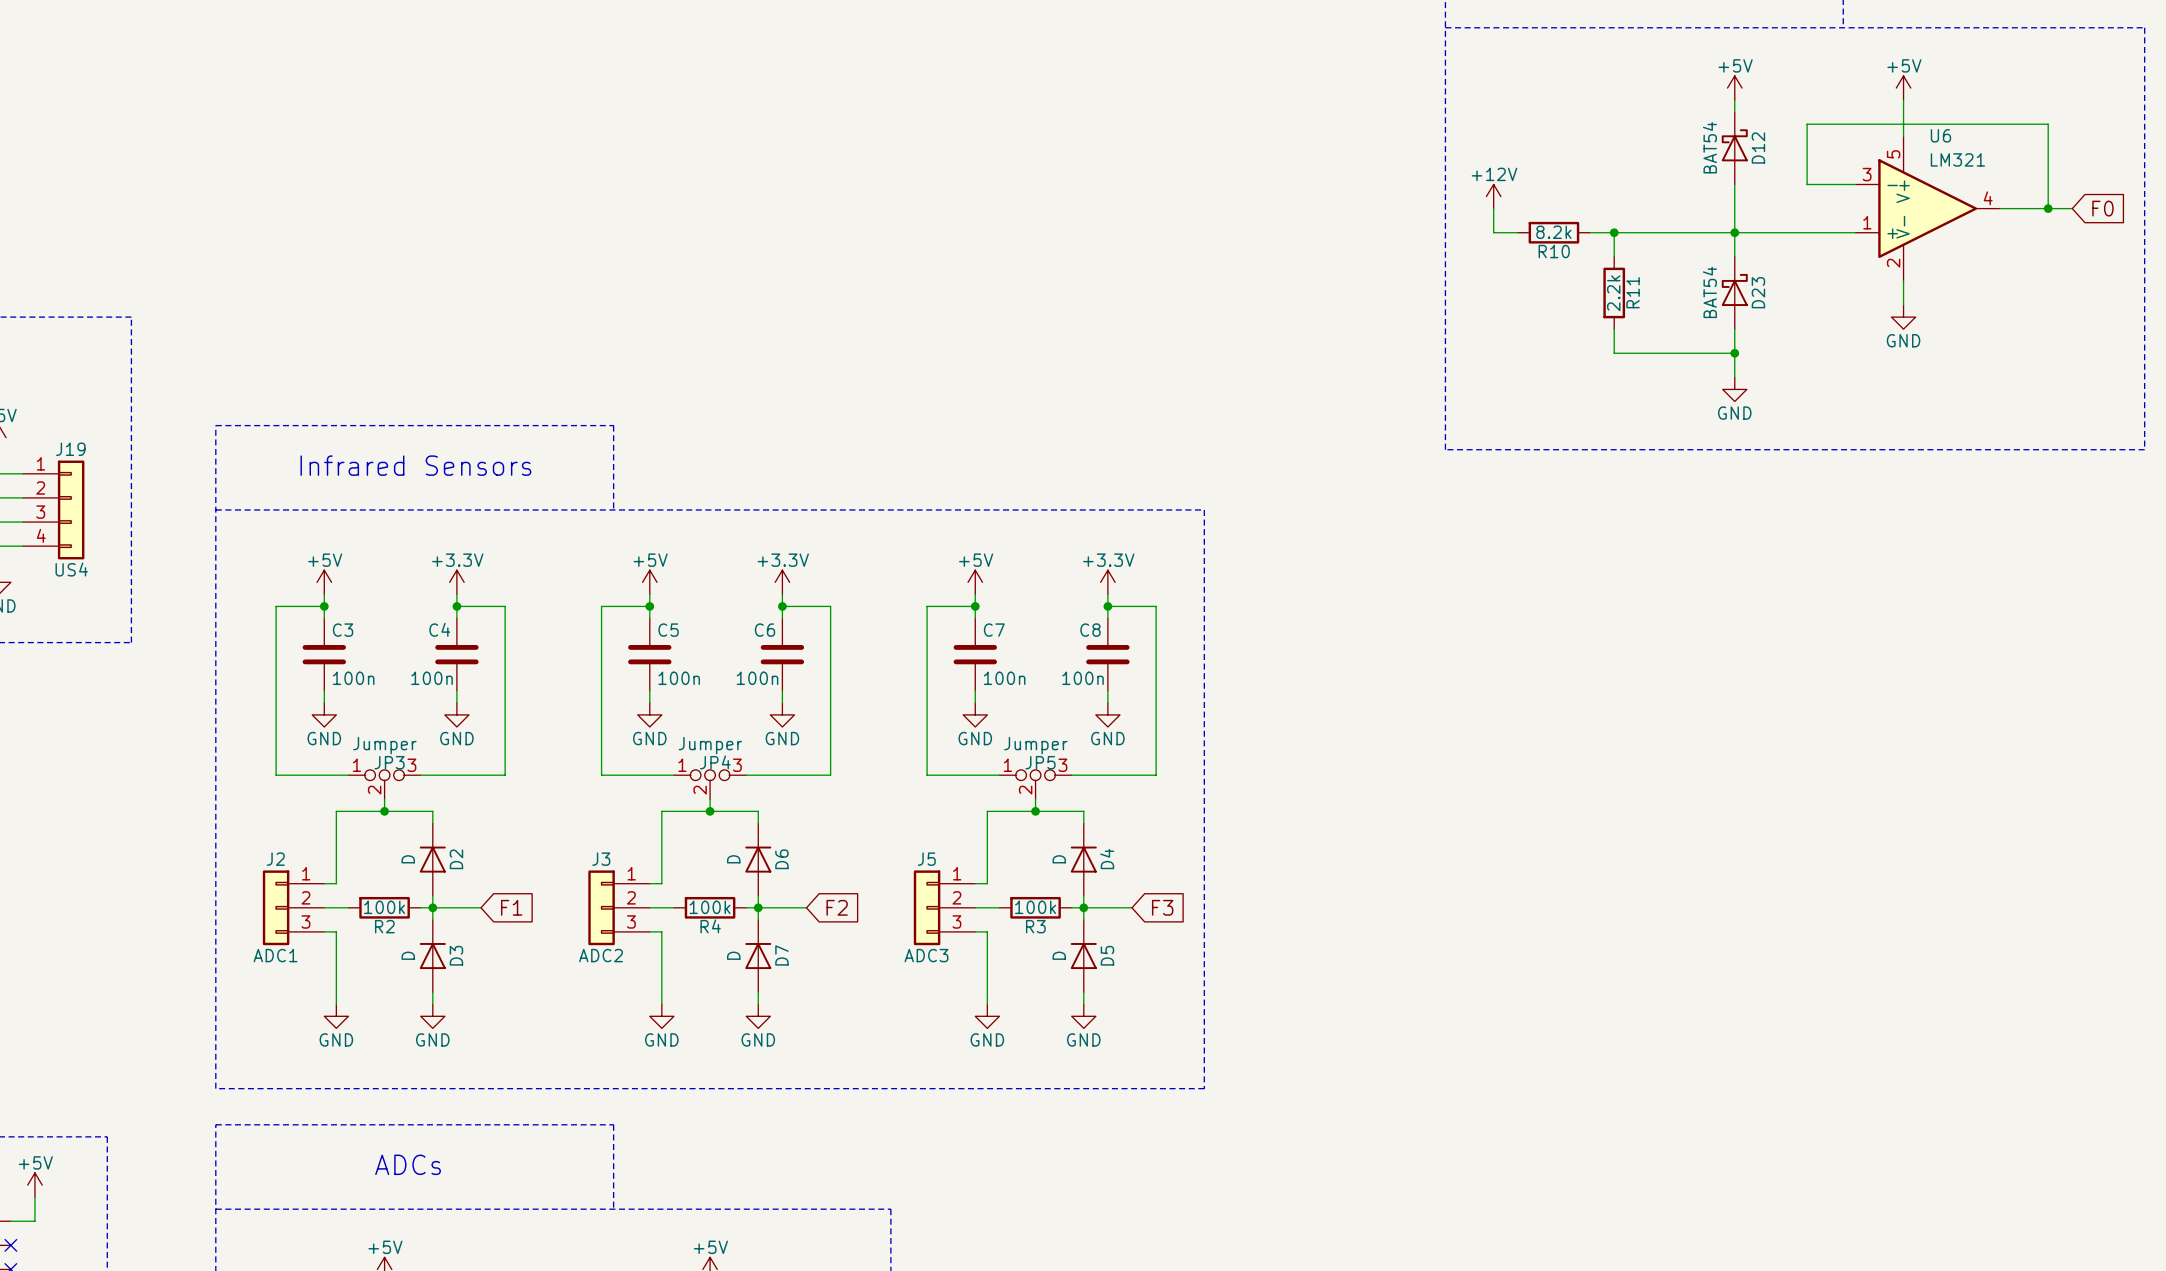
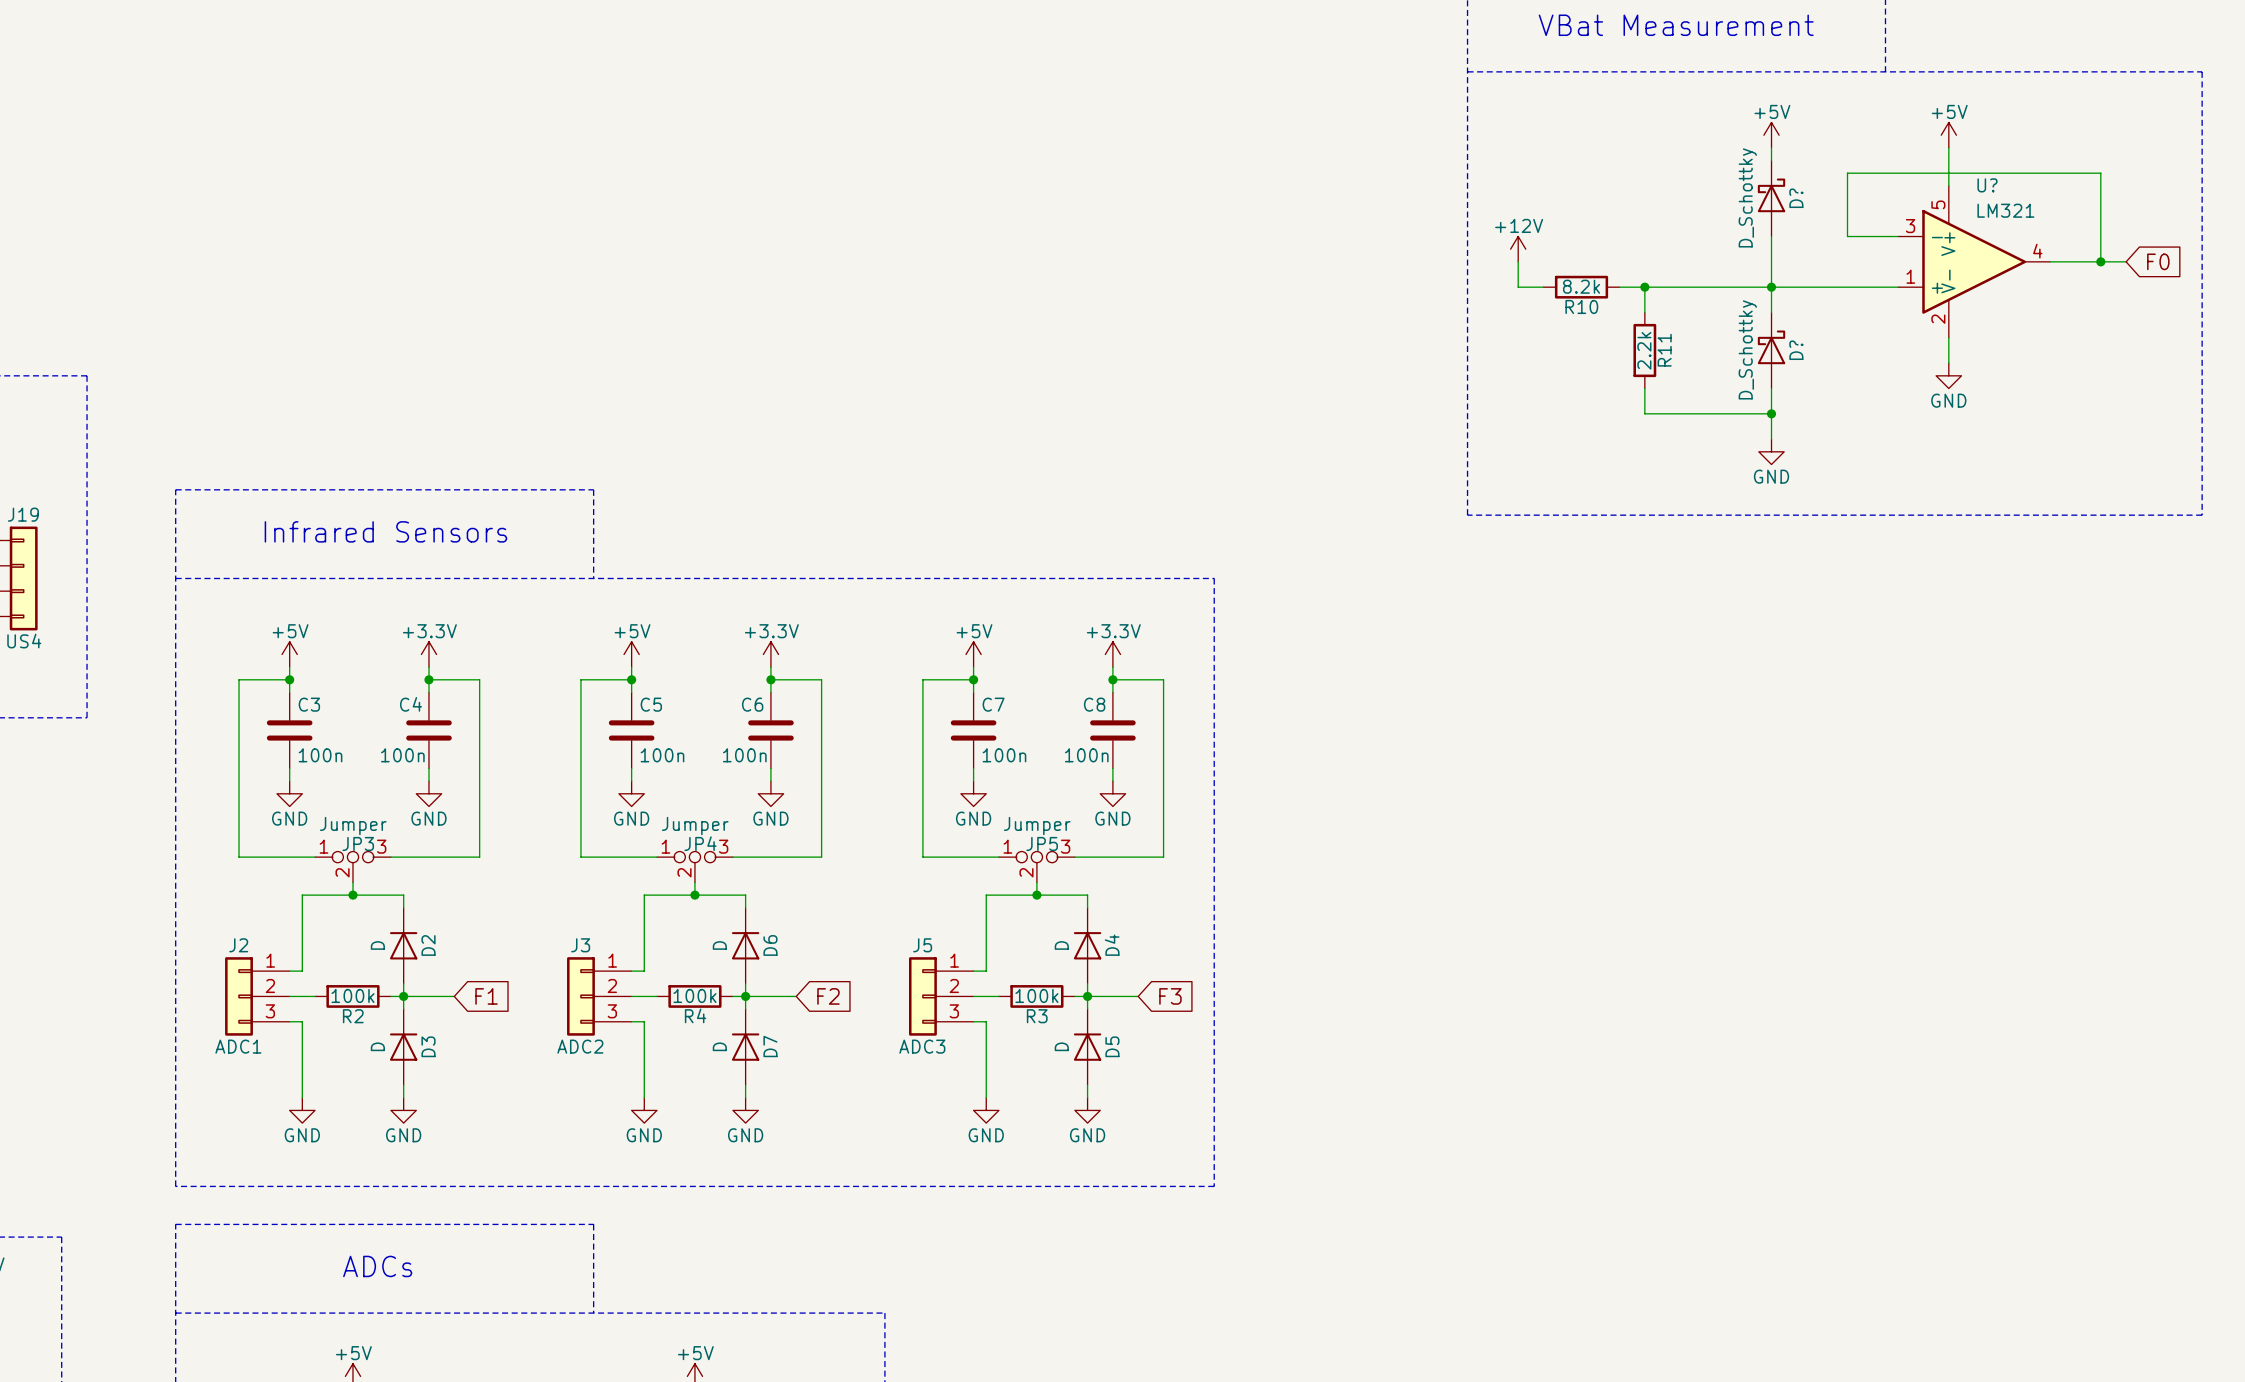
U6 name: U6 (1940, 135) -> U? (1987, 185)
D12 value: BAT54 (1709, 147) -> D_Schottky (1747, 197)
D12 name: D12 (1758, 148) -> D? (1796, 198)
D23 value: BAT54 (1709, 292) -> D_Schottky (1747, 349)
D23 name: D23 (1758, 292) -> D? (1796, 350)

